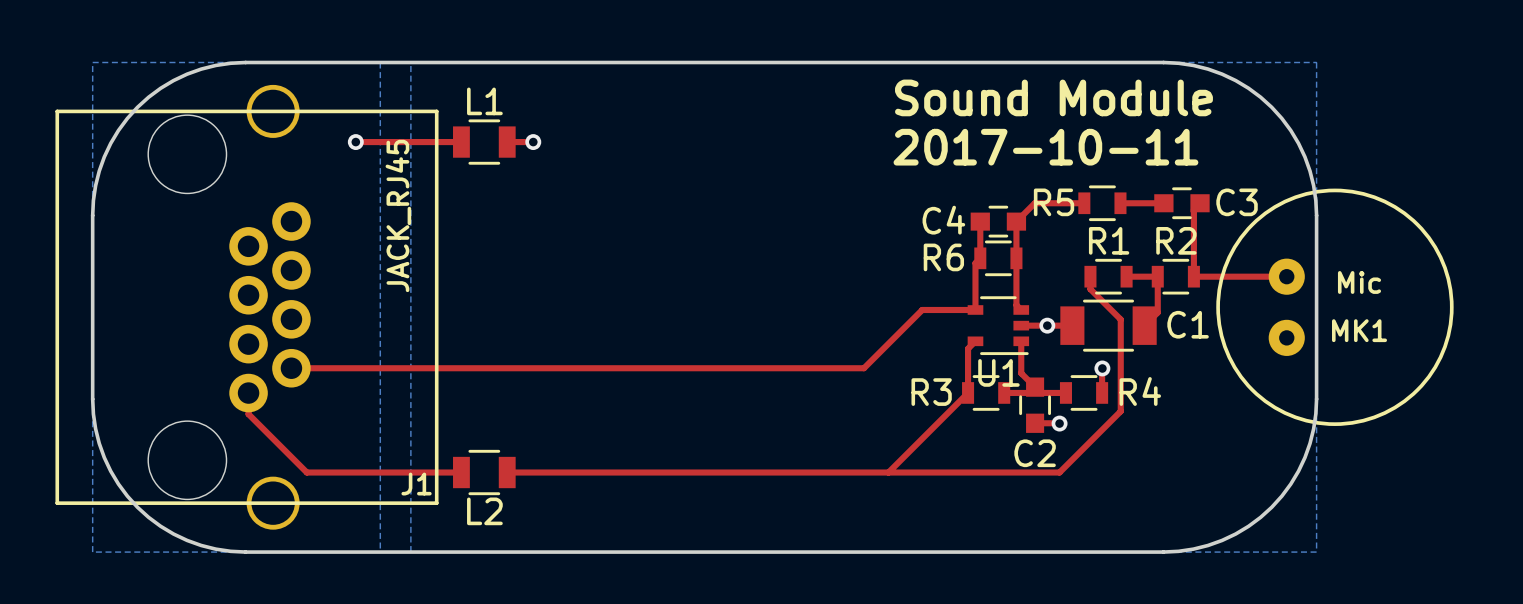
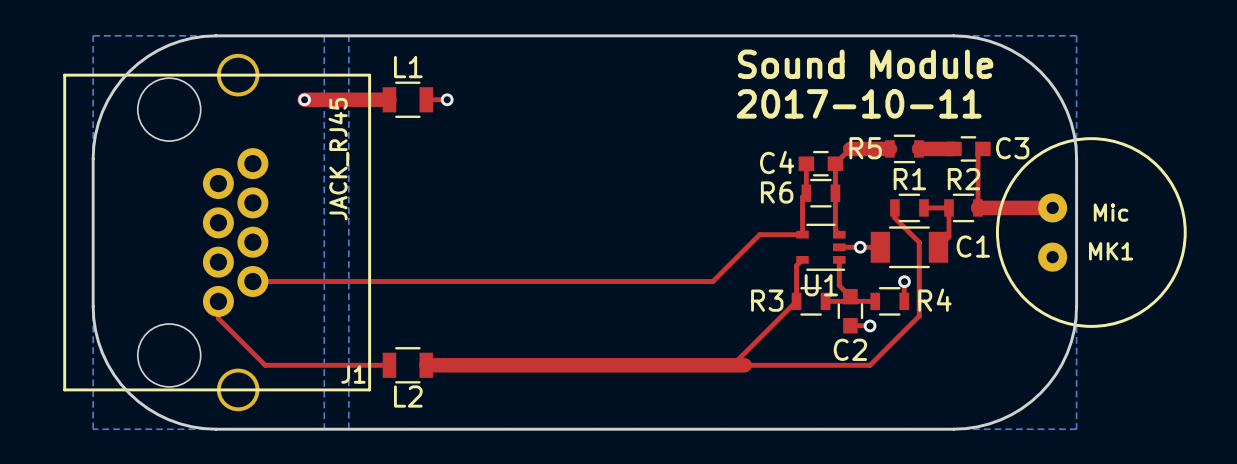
top track width: thin (355, 142) (461, 142) -> thick (304, 99) (389, 99)
top track width: thin (1034, 203) (1084, 203) -> thick (850, 148) (889, 148)
top track width: thin (1120, 203) (1163, 203) -> thick (919, 148) (953, 148)
top track width: thin (1193, 276) (1286, 276) -> thick (978, 207) (1052, 207)
top track width: thin (507, 472) (903, 472) -> thick (426, 365) (744, 365)

